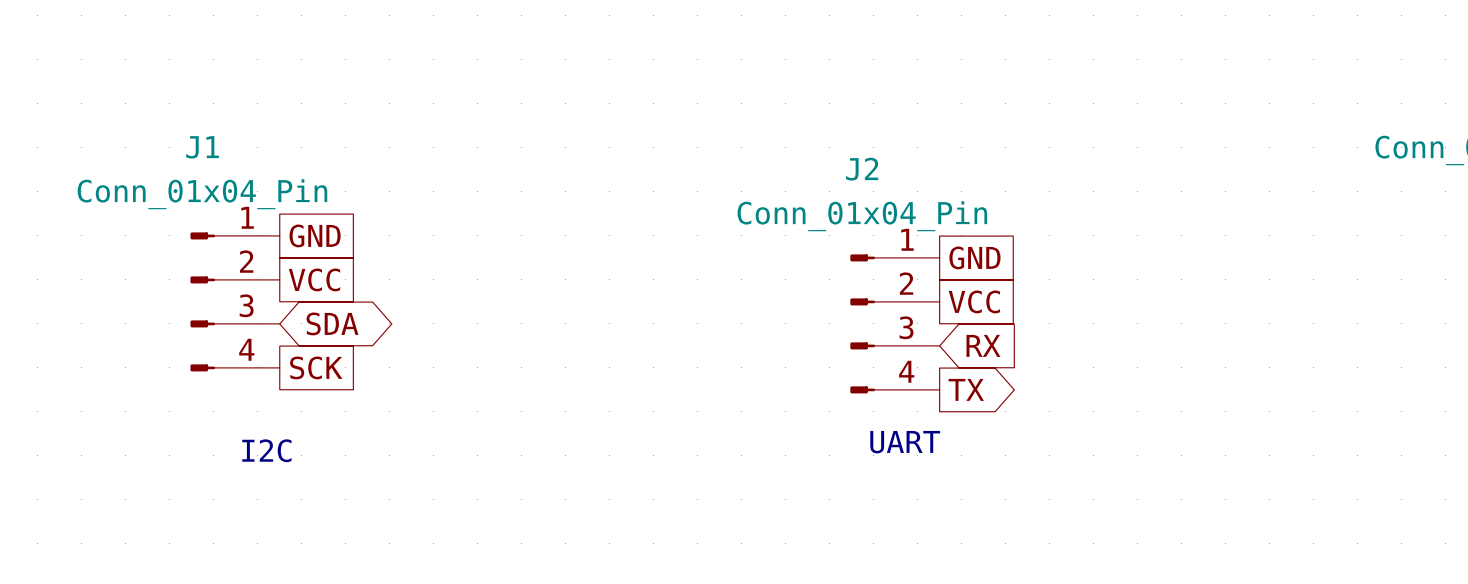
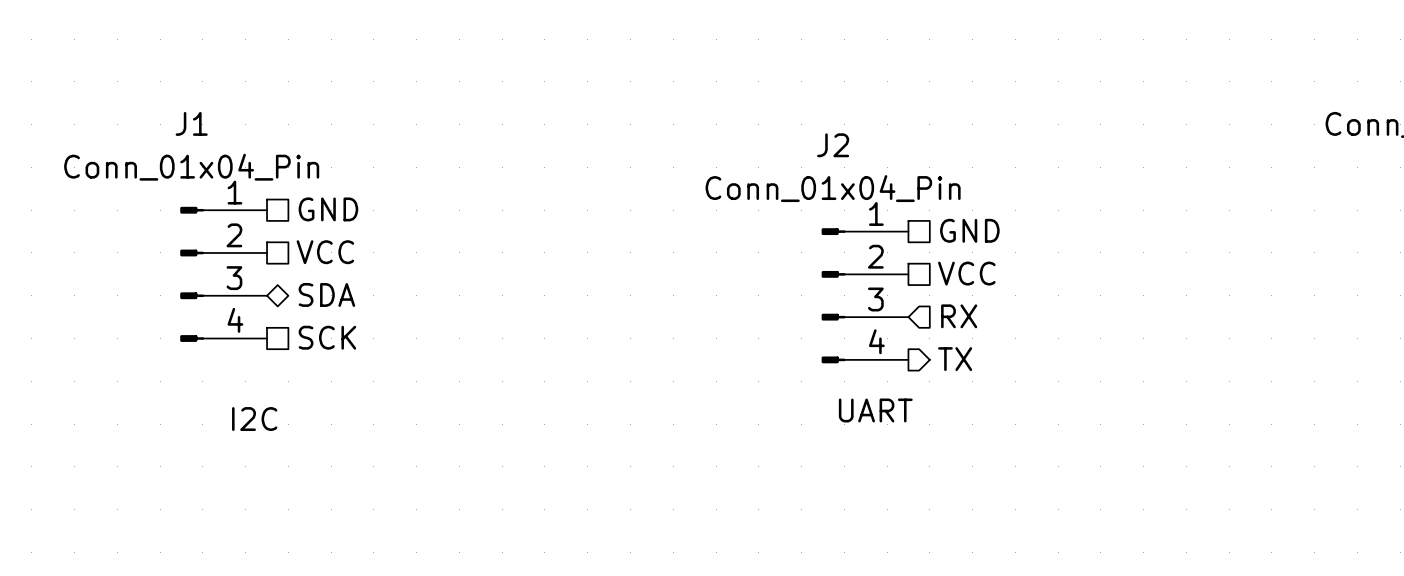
global label: GND (315, 235) -> none
hierarchical label: none -> GND (328, 209)
global label: GND (974, 257) -> none
hierarchical label: none -> GND (969, 230)
global label: VCC (314, 279) -> none
hierarchical label: none -> VCC (325, 252)
global label: VCC (974, 301) -> none
hierarchical label: none -> VCC (966, 273)
global label: SDA (332, 323) -> none
hierarchical label: none -> SDA (326, 294)
global label: RX (983, 345) -> none
hierarchical label: none -> RX (959, 316)
global label: SCK (316, 367) -> none
hierarchical label: none -> SCK (327, 337)
global label: TX (966, 389) -> none
hierarchical label: none -> TX (955, 359)

